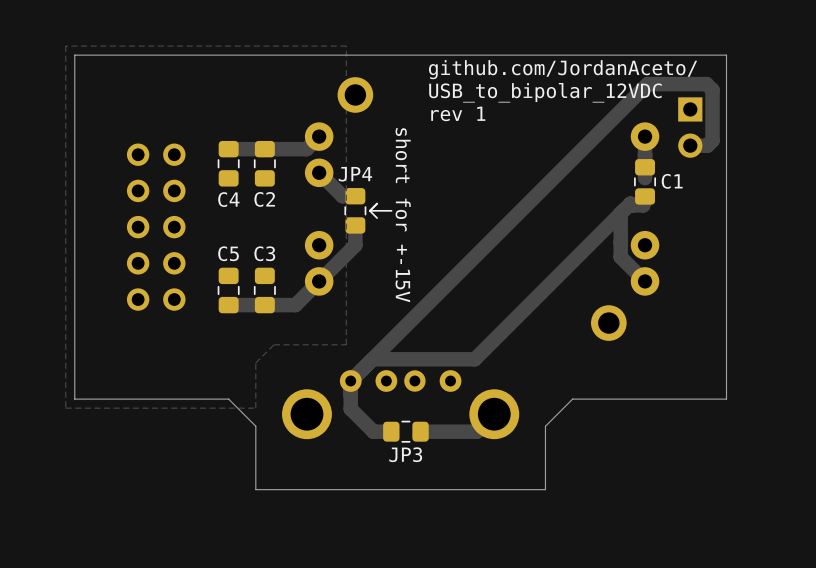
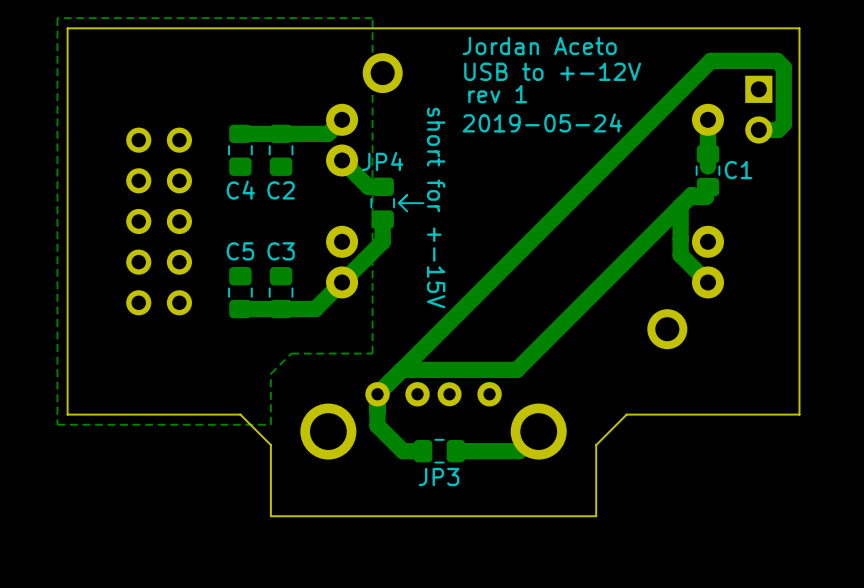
text: github.com/JordanAceto/ (563, 69) -> Jordan Aceto (539, 46)
text: USB_to_bipolar_12VDC (545, 92) -> USB to +-12V (552, 71)
text: none -> 2019-05-24 (542, 122)

